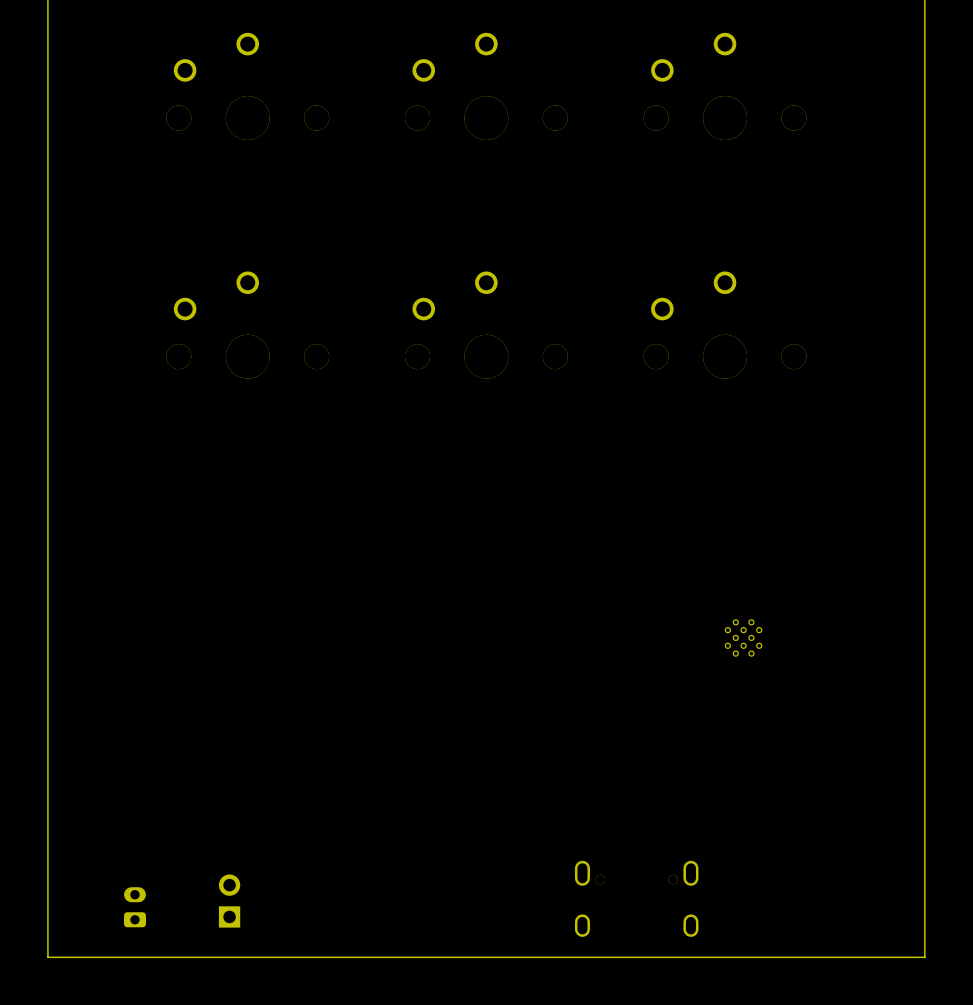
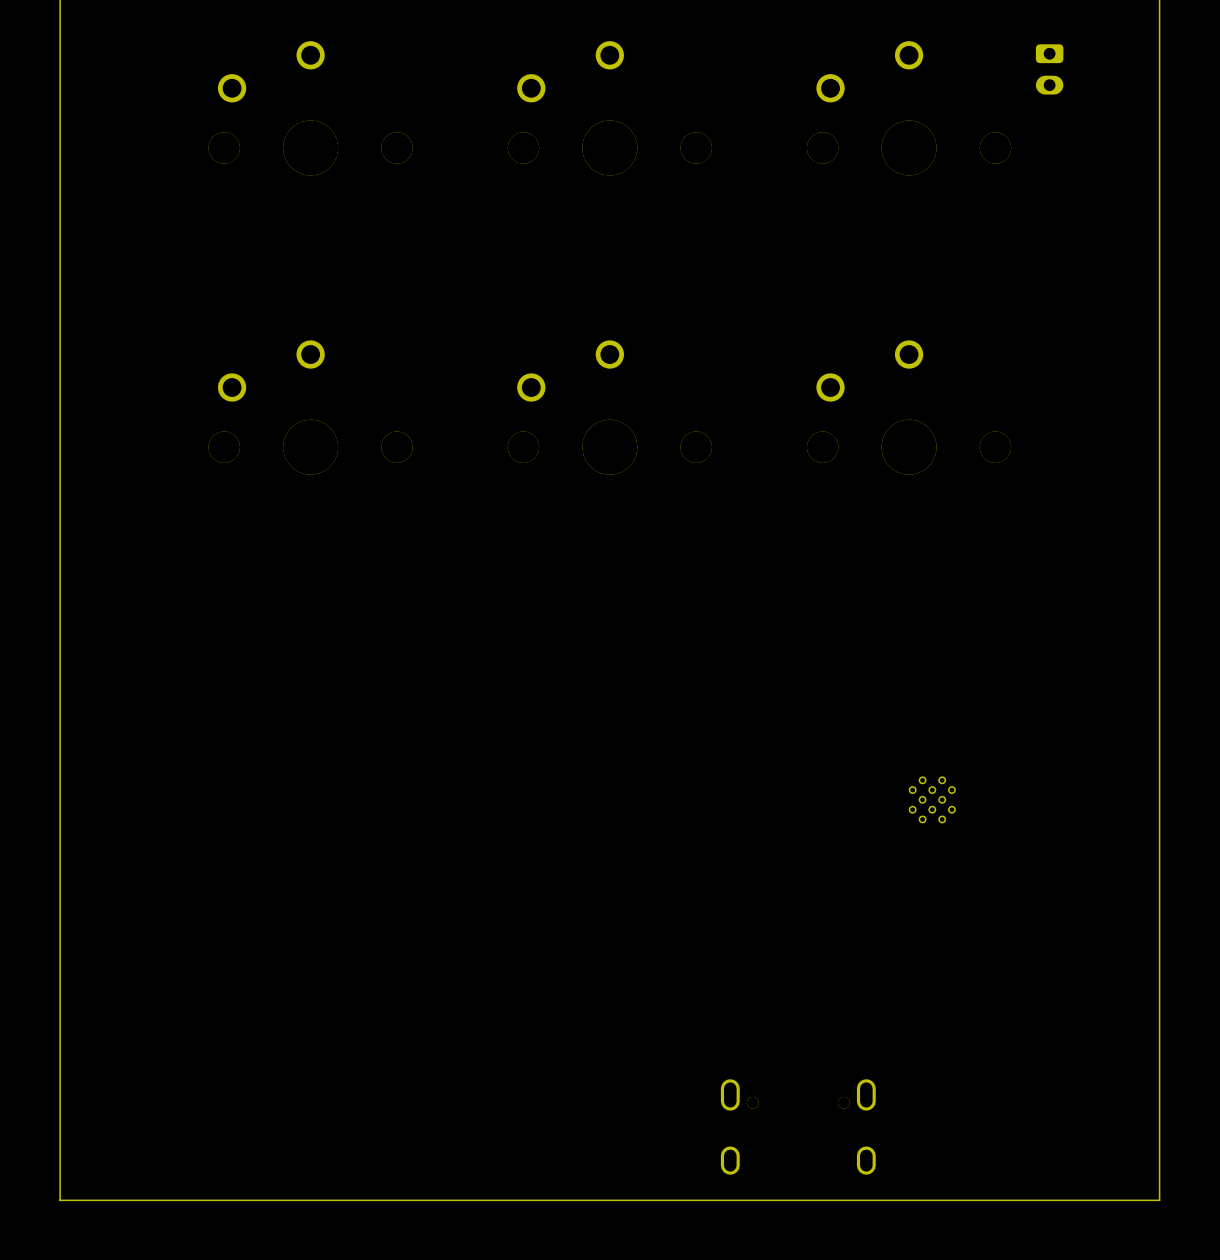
part: none -> (1049, 69)
part: (229, 901) -> none
part: (134, 907) -> none

